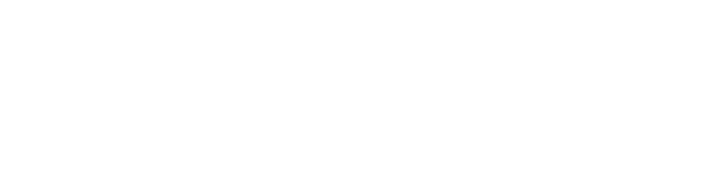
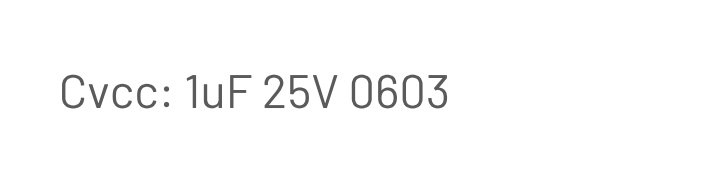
text: none -> Cvcc: 1uF 25V 0603 (254, 91)

